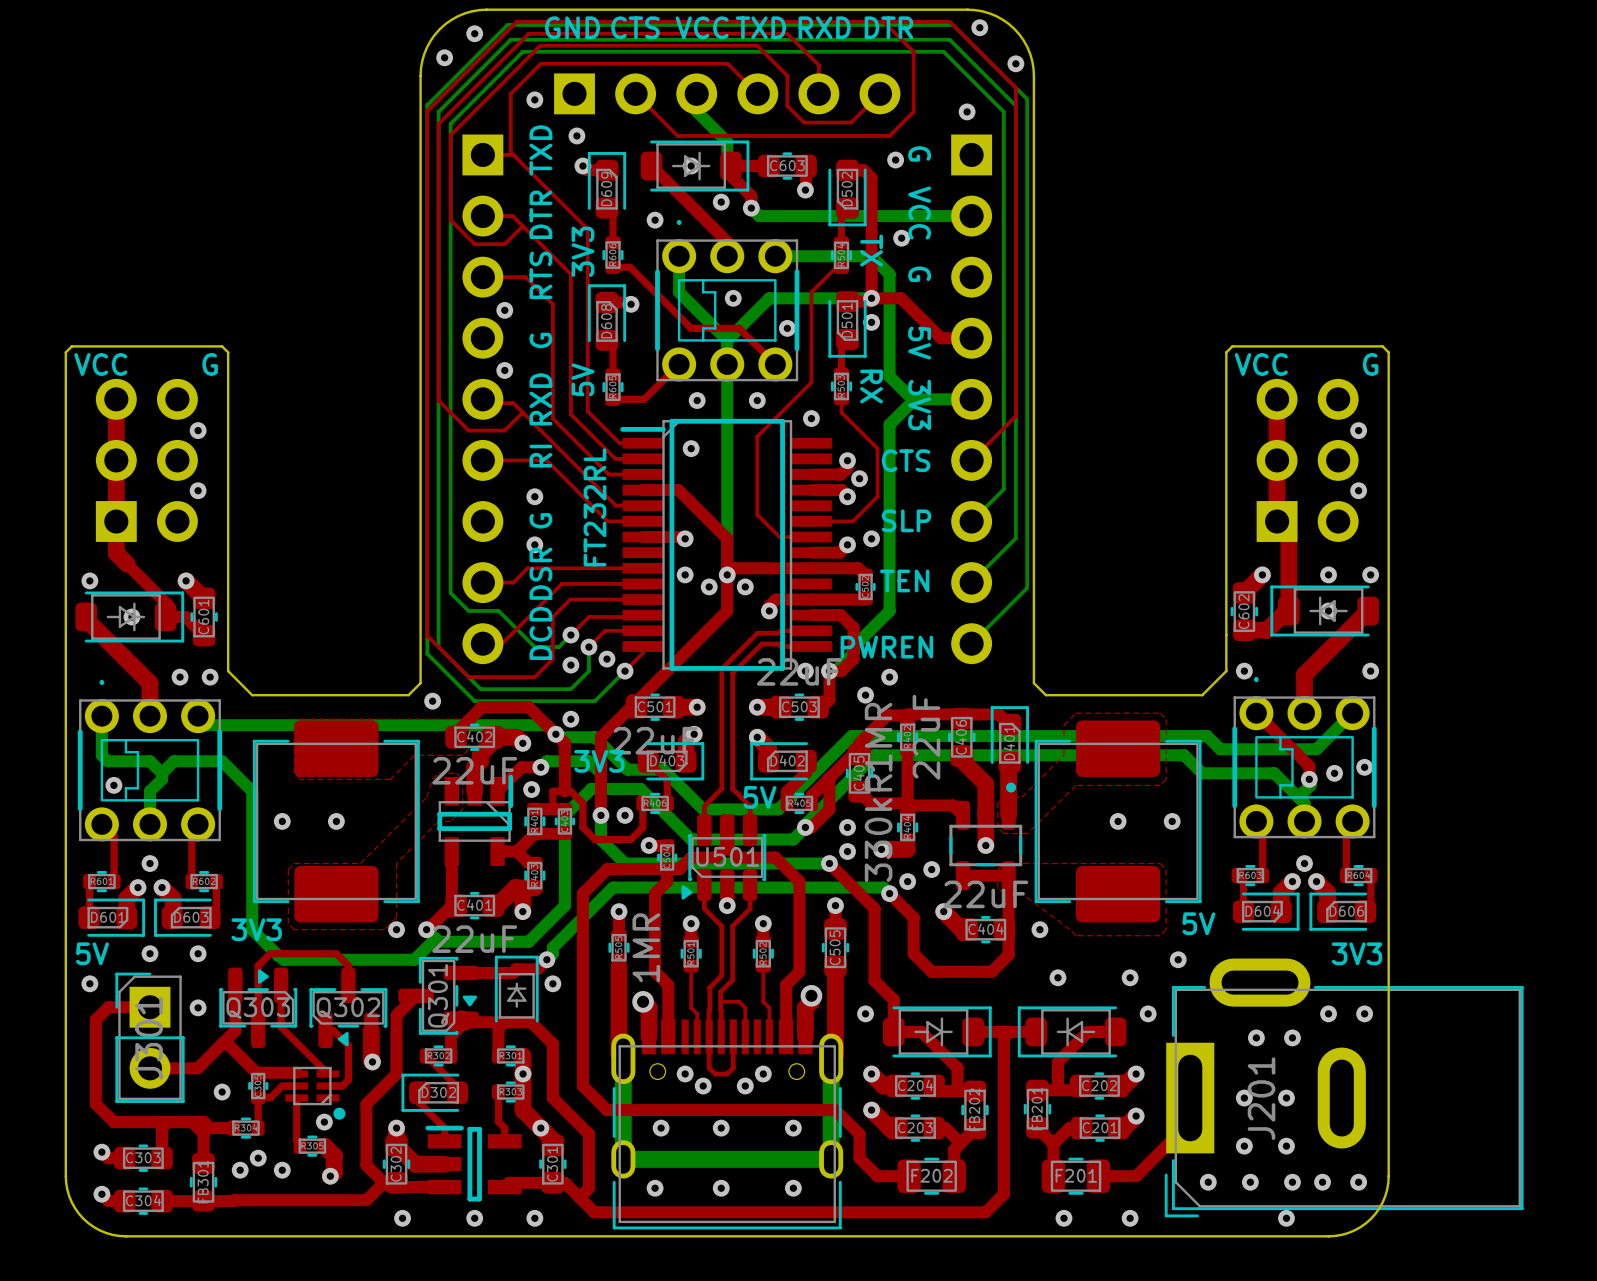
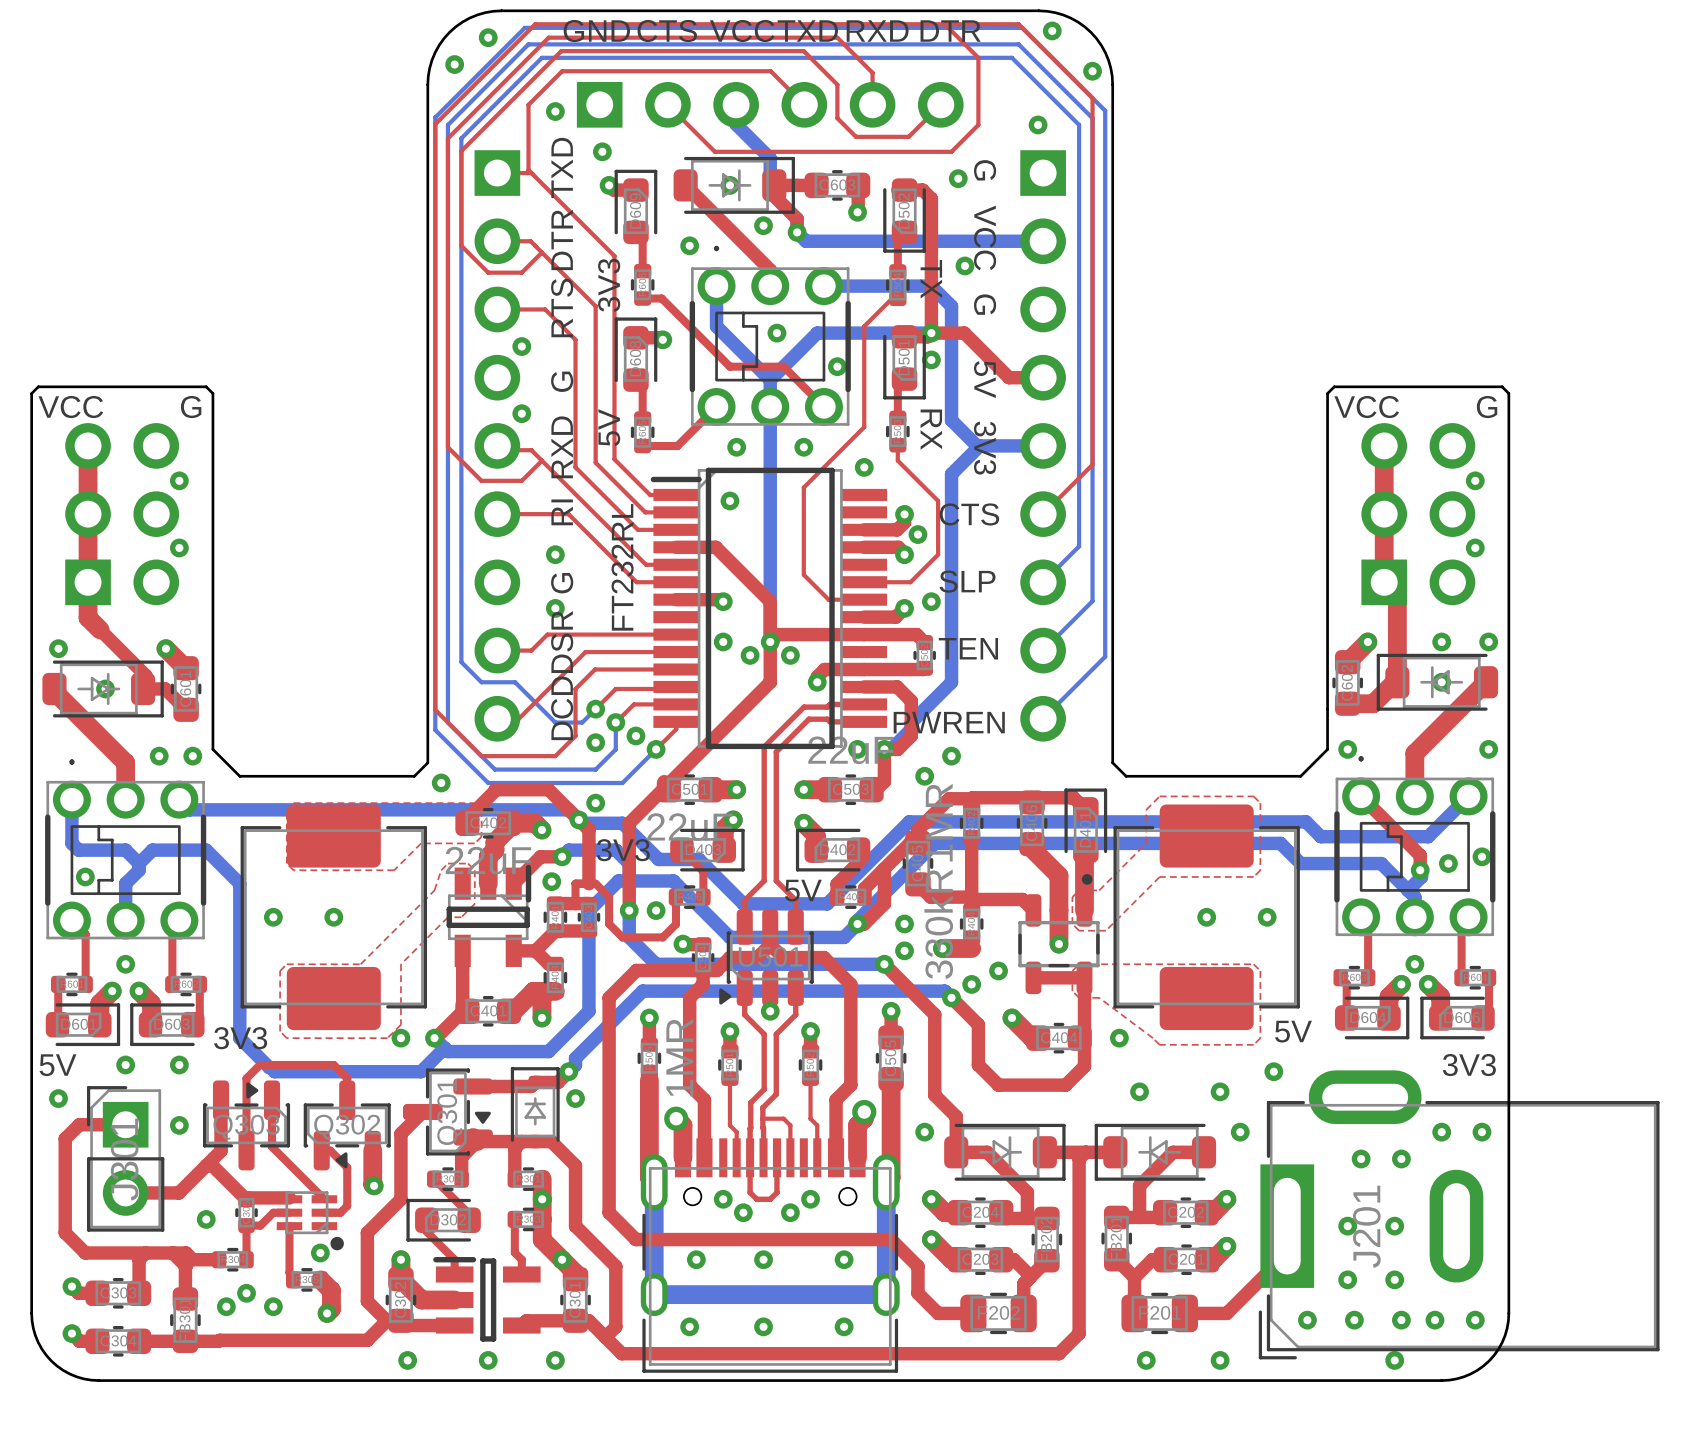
C406 value: 22uF (926, 737) -> none
C404 value: 22uF (985, 894) -> none
C401 value: 22uF (474, 939) -> none

